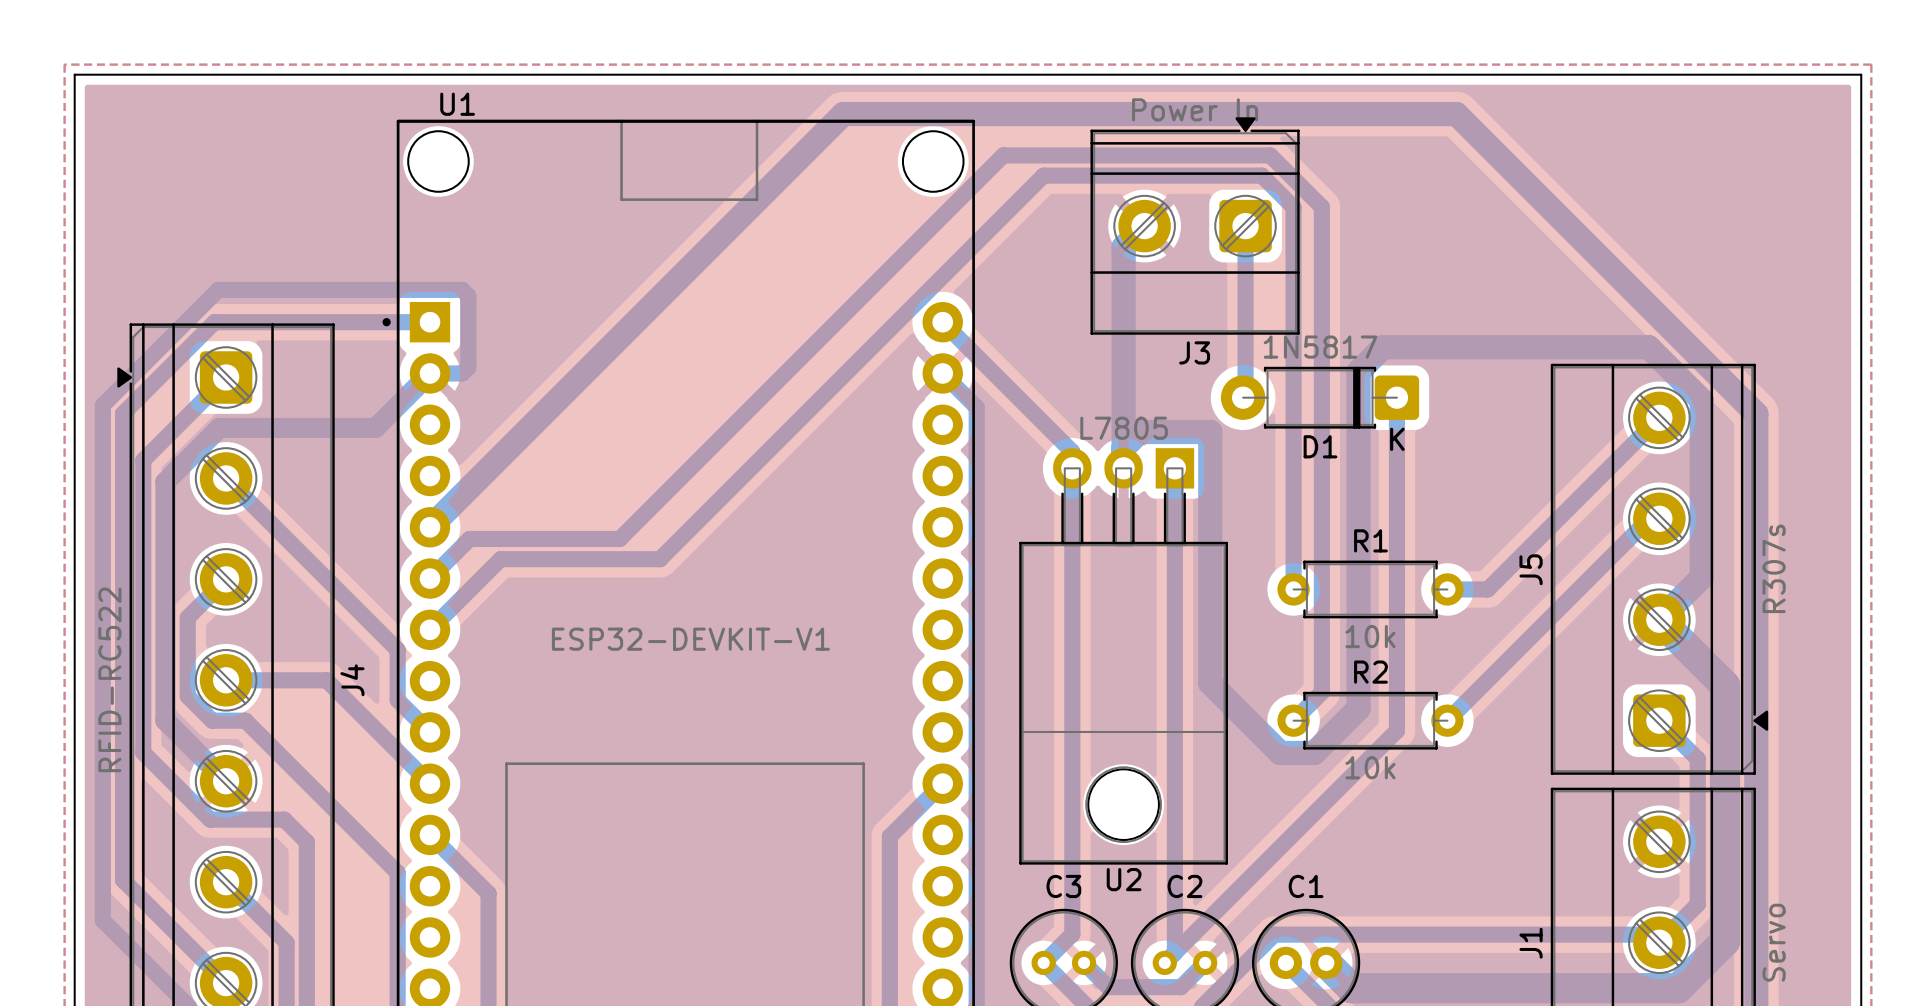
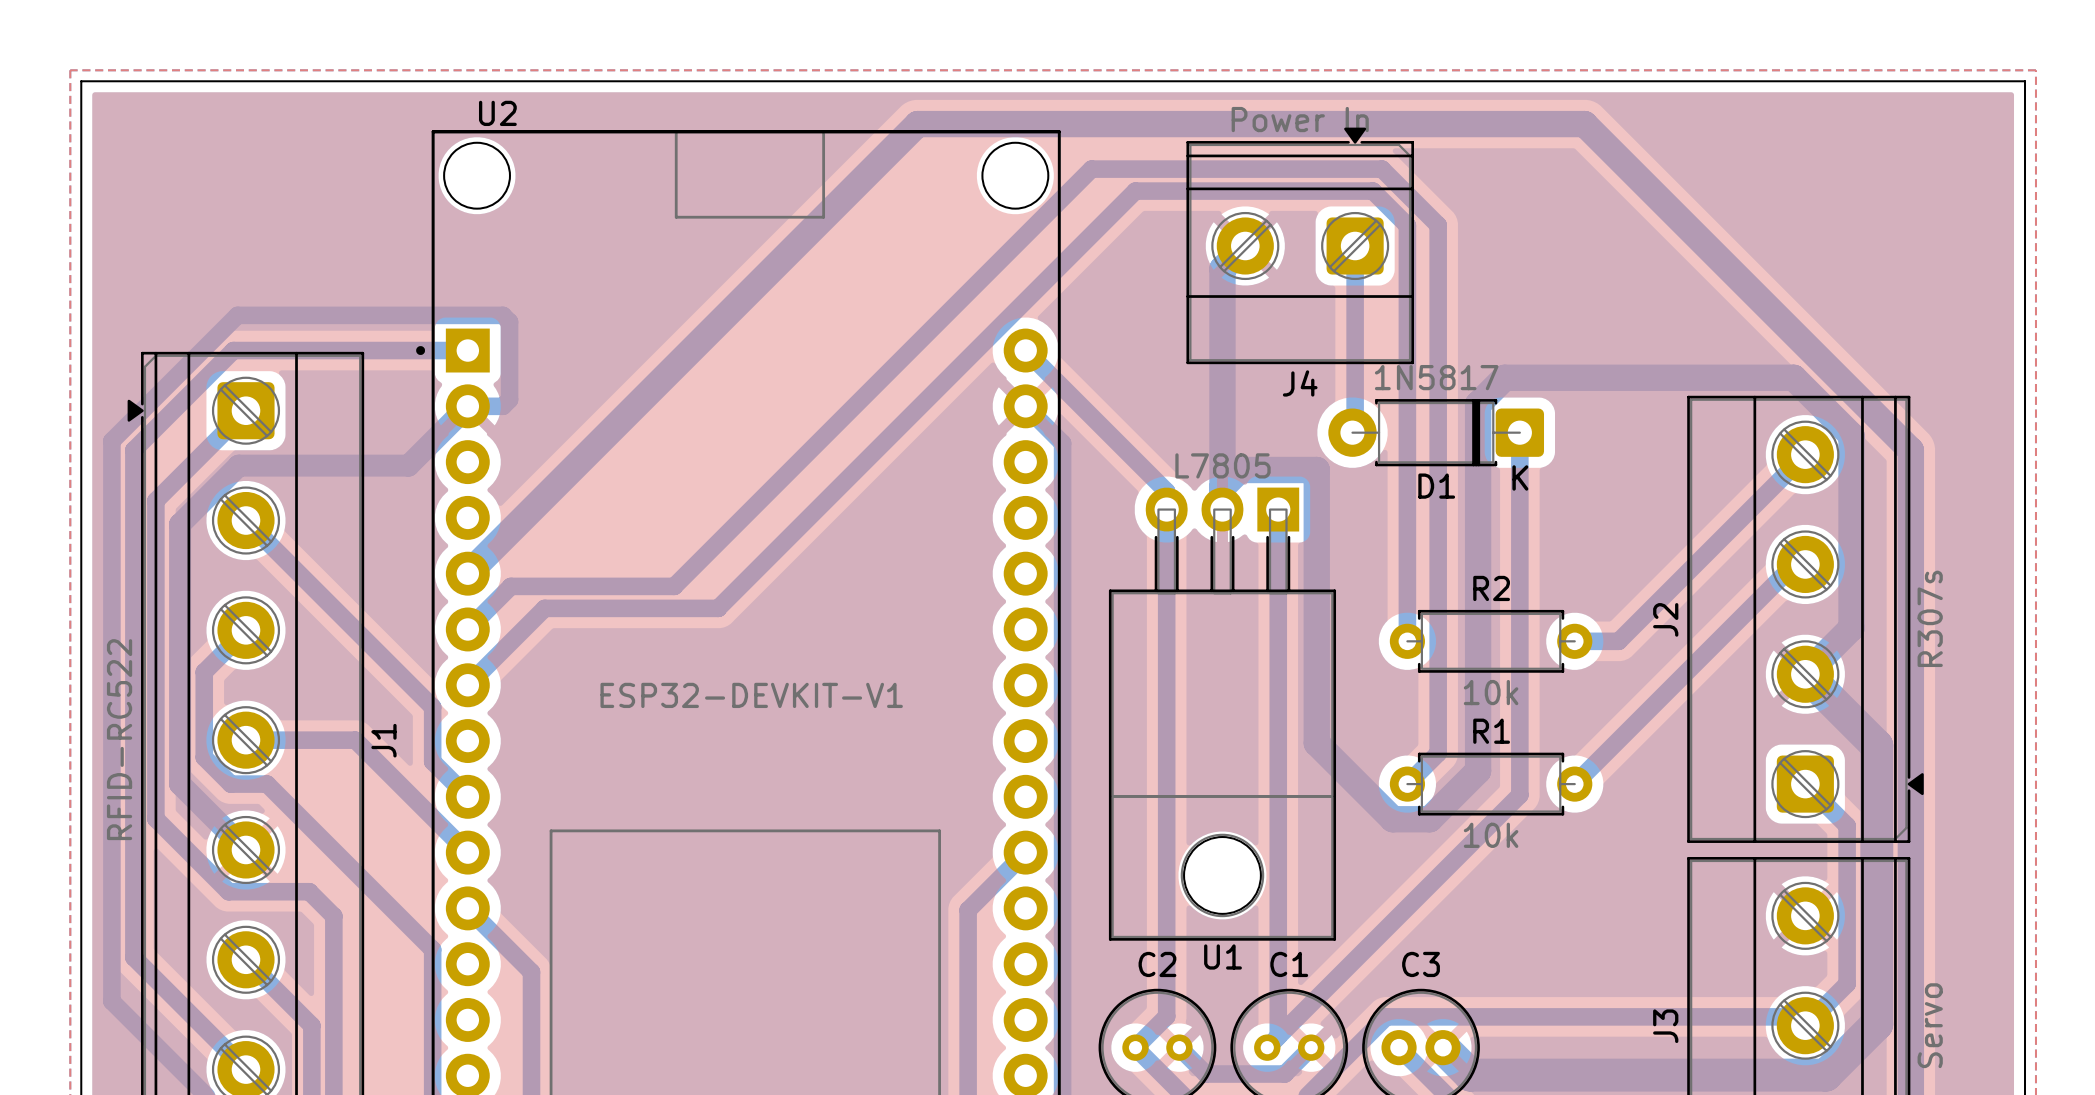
U1 name: U1 (457, 104) -> U2 (497, 113)
J3 name: J3 (1194, 352) -> J4 (1300, 383)
R1 name: R1 (1370, 540) -> R2 (1491, 588)
J5 name: J5 (1531, 569) -> J2 (1665, 619)
R2 name: R2 (1370, 672) -> R1 (1491, 731)
J4 name: J4 (352, 680) -> J1 (383, 740)
U2 name: U2 (1124, 879) -> U1 (1222, 956)
C3 name: C3 (1063, 886) -> C2 (1157, 964)
C2 name: C2 (1184, 886) -> C1 (1289, 964)
C1 name: C1 (1306, 886) -> C3 (1421, 964)
J1 name: J1 (1531, 943) -> J3 (1665, 1026)

